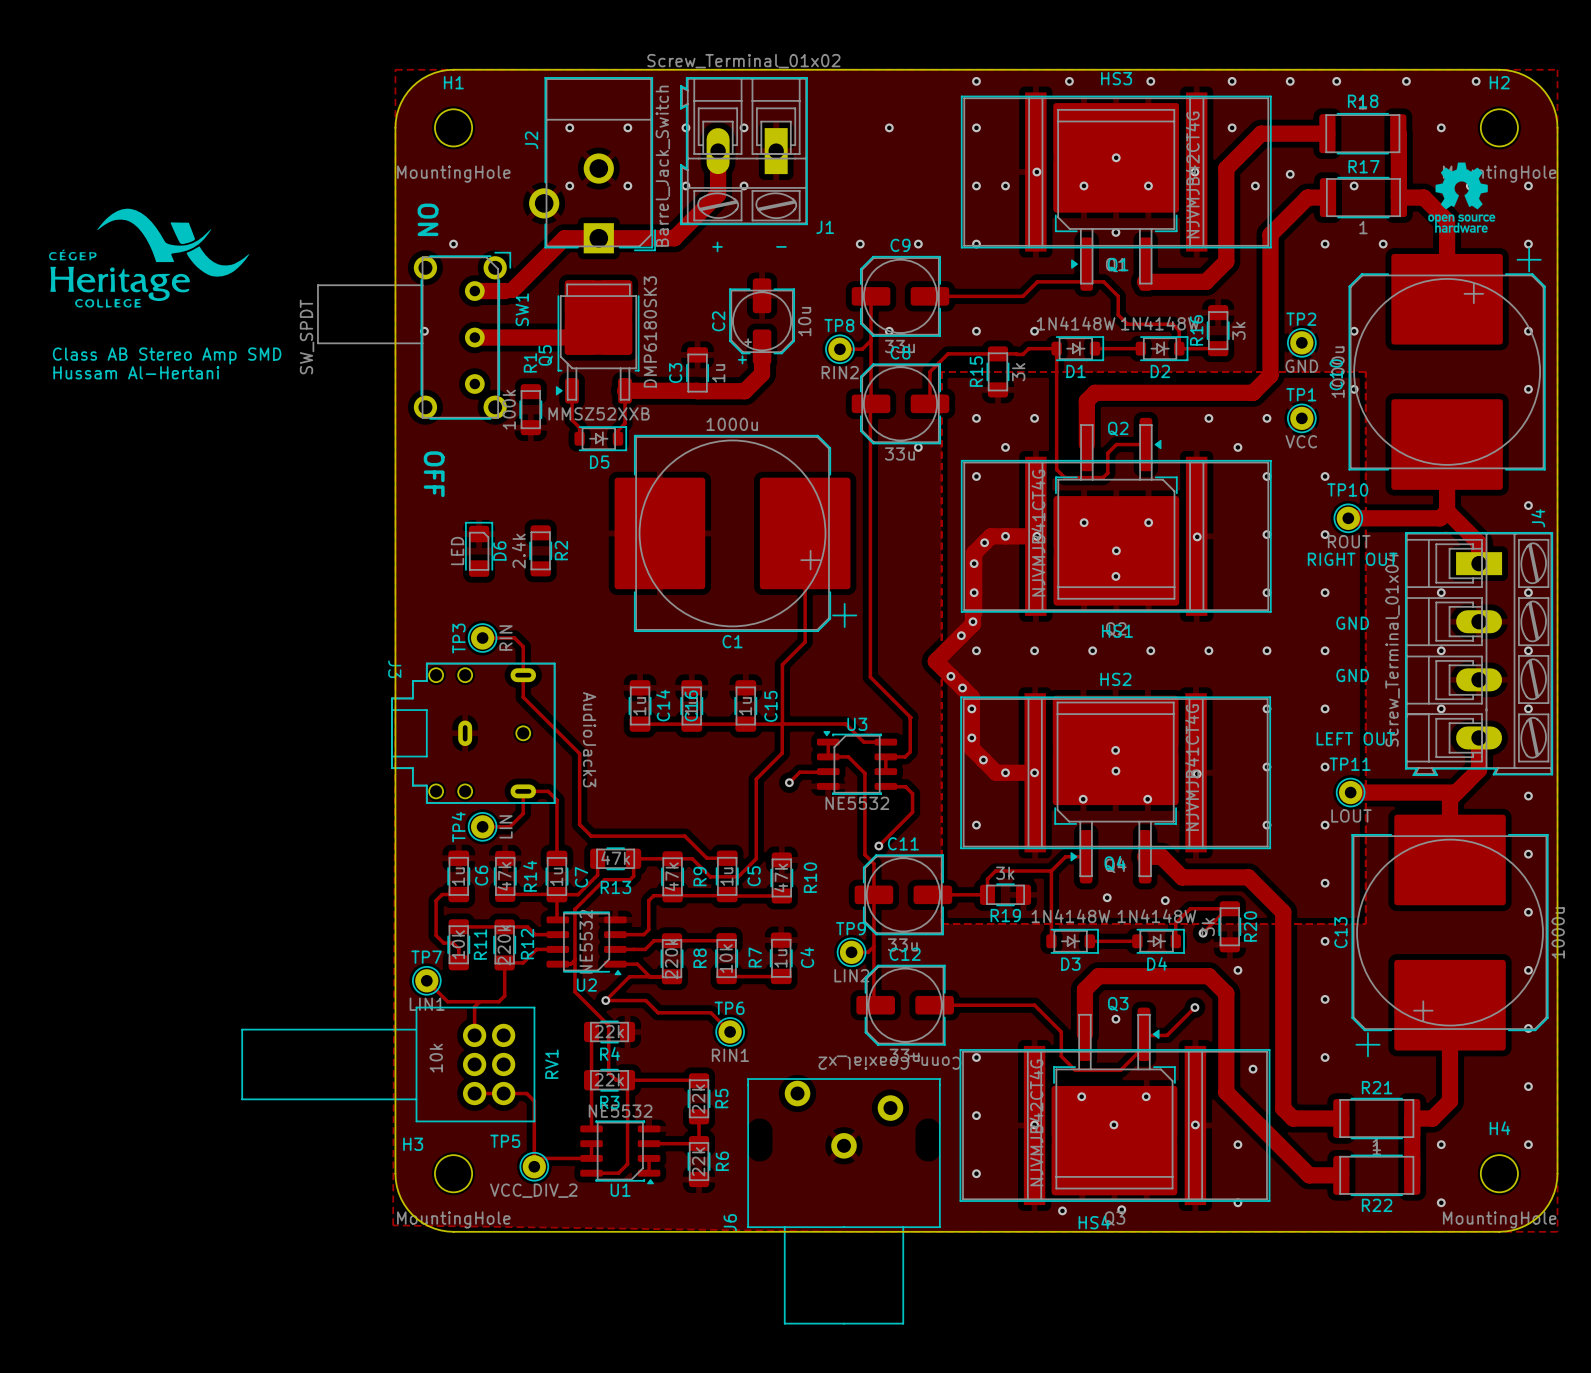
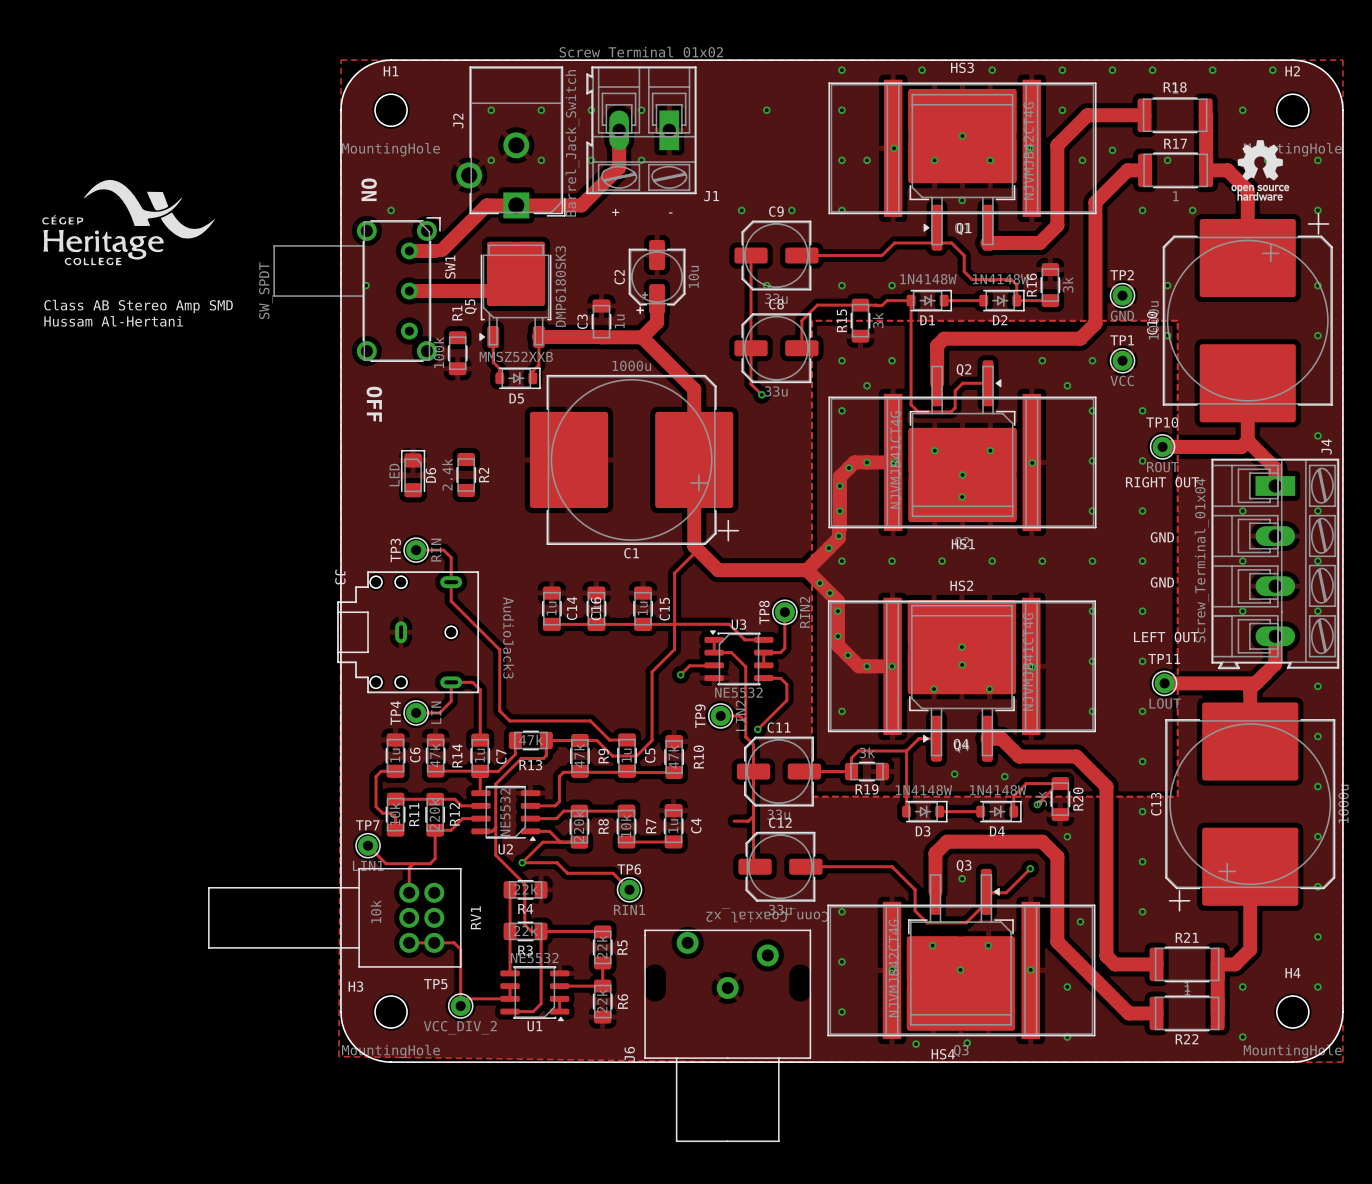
TP8 name rotation: 0° (839, 325) -> 90° counterclockwise (764, 612)
track: (871, 340) (862, 349) (839, 349) -> none
TP8 position: (839, 349) -> (784, 612)
TP8 value rotation: 0° (840, 372) -> 90° counterclockwise (804, 612)
track: none -> (642, 337) (694, 389) (694, 546) (718, 570) (806, 570)
track: (871, 403) (870, 677) (910, 718) -> (751, 348) (751, 384) (761, 394)
via position: (918, 447) -> (761, 394)
track: none -> (720, 715) (739, 715) (745, 721)
TP9 name rotation: 0° (851, 928) -> 90° counterclockwise (700, 716)
TP9 position: (851, 952) -> (720, 715)
TP9 value rotation: 0° (851, 975) -> 90° counterclockwise (740, 715)

